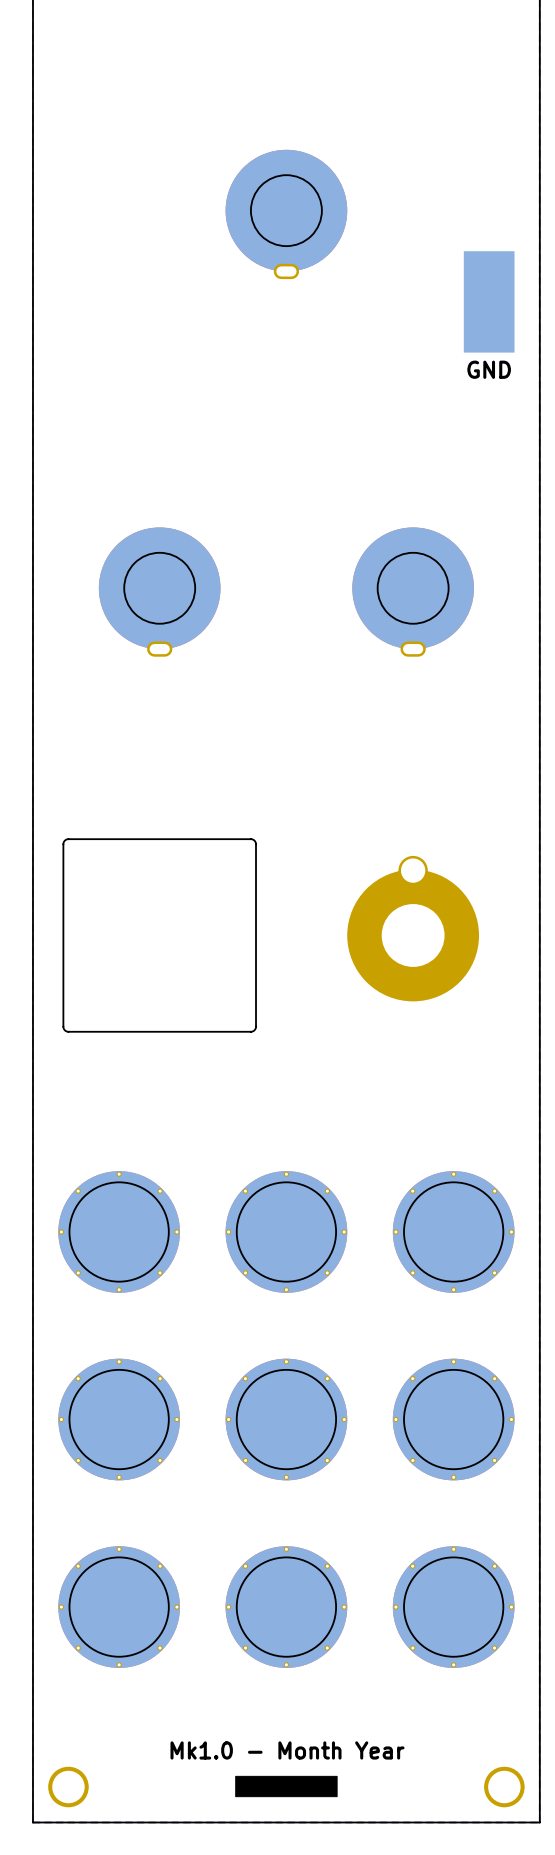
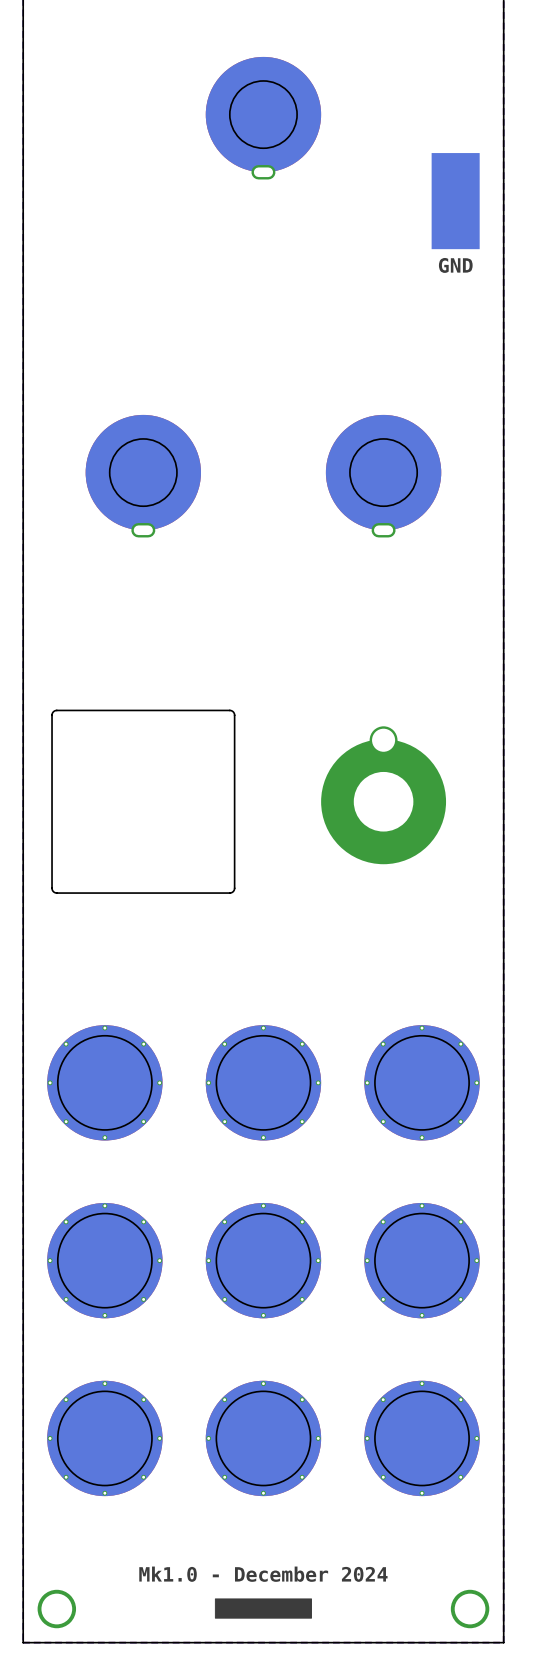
text: Mk1.0 - Month Year (287, 1750) -> Mk1.0 - December 2024 (263, 1574)

